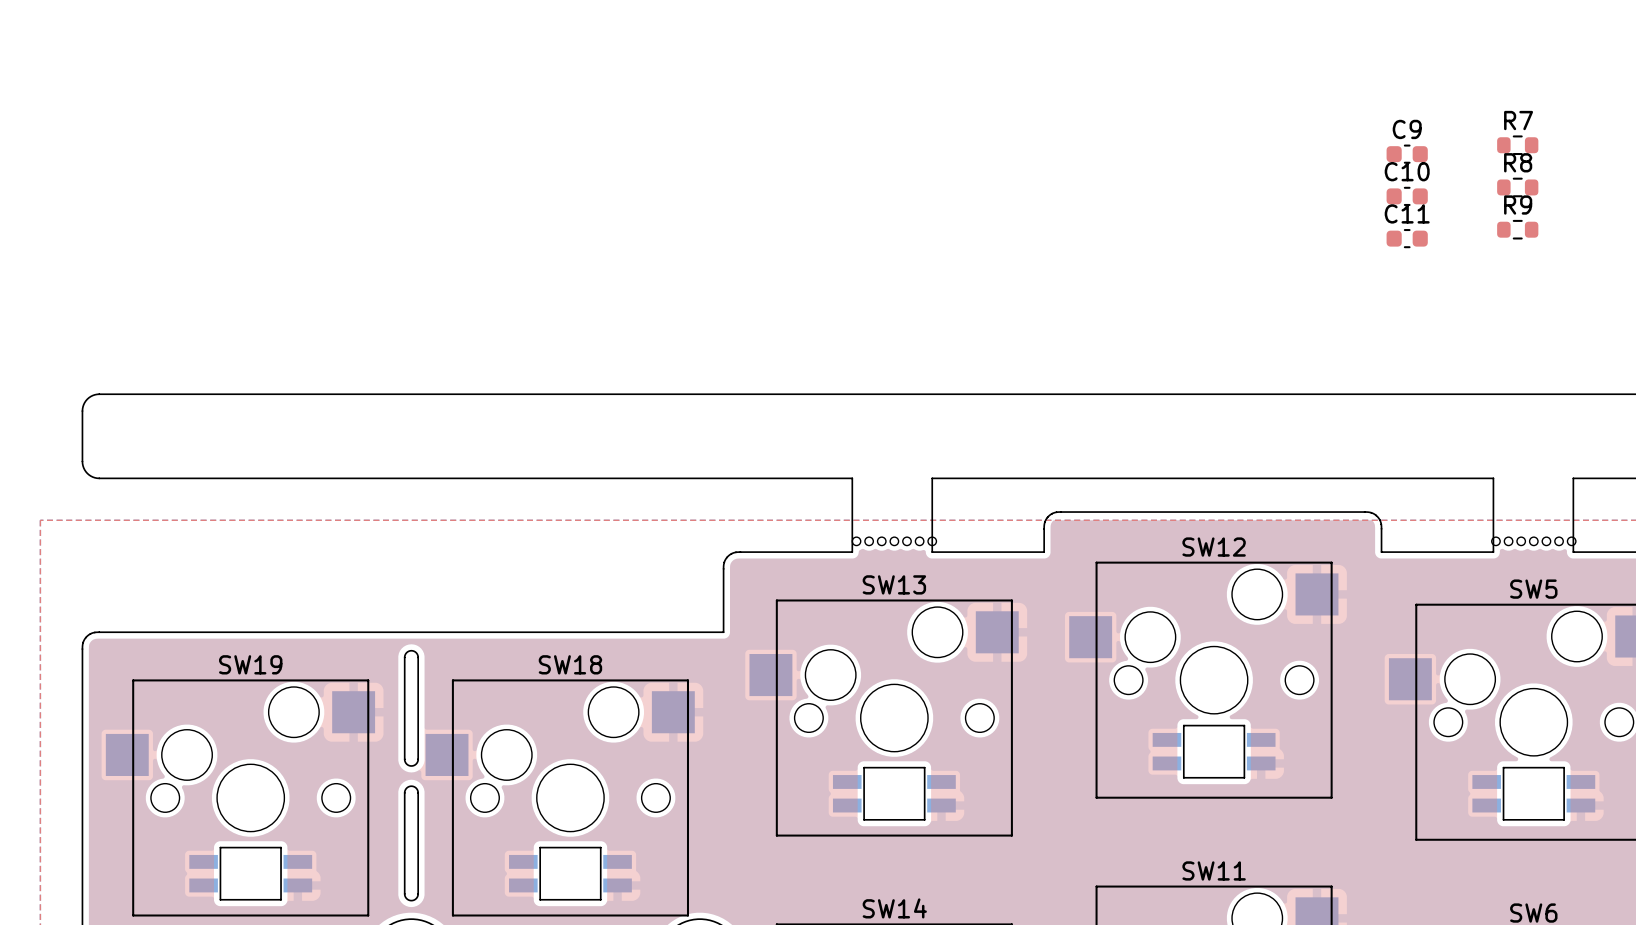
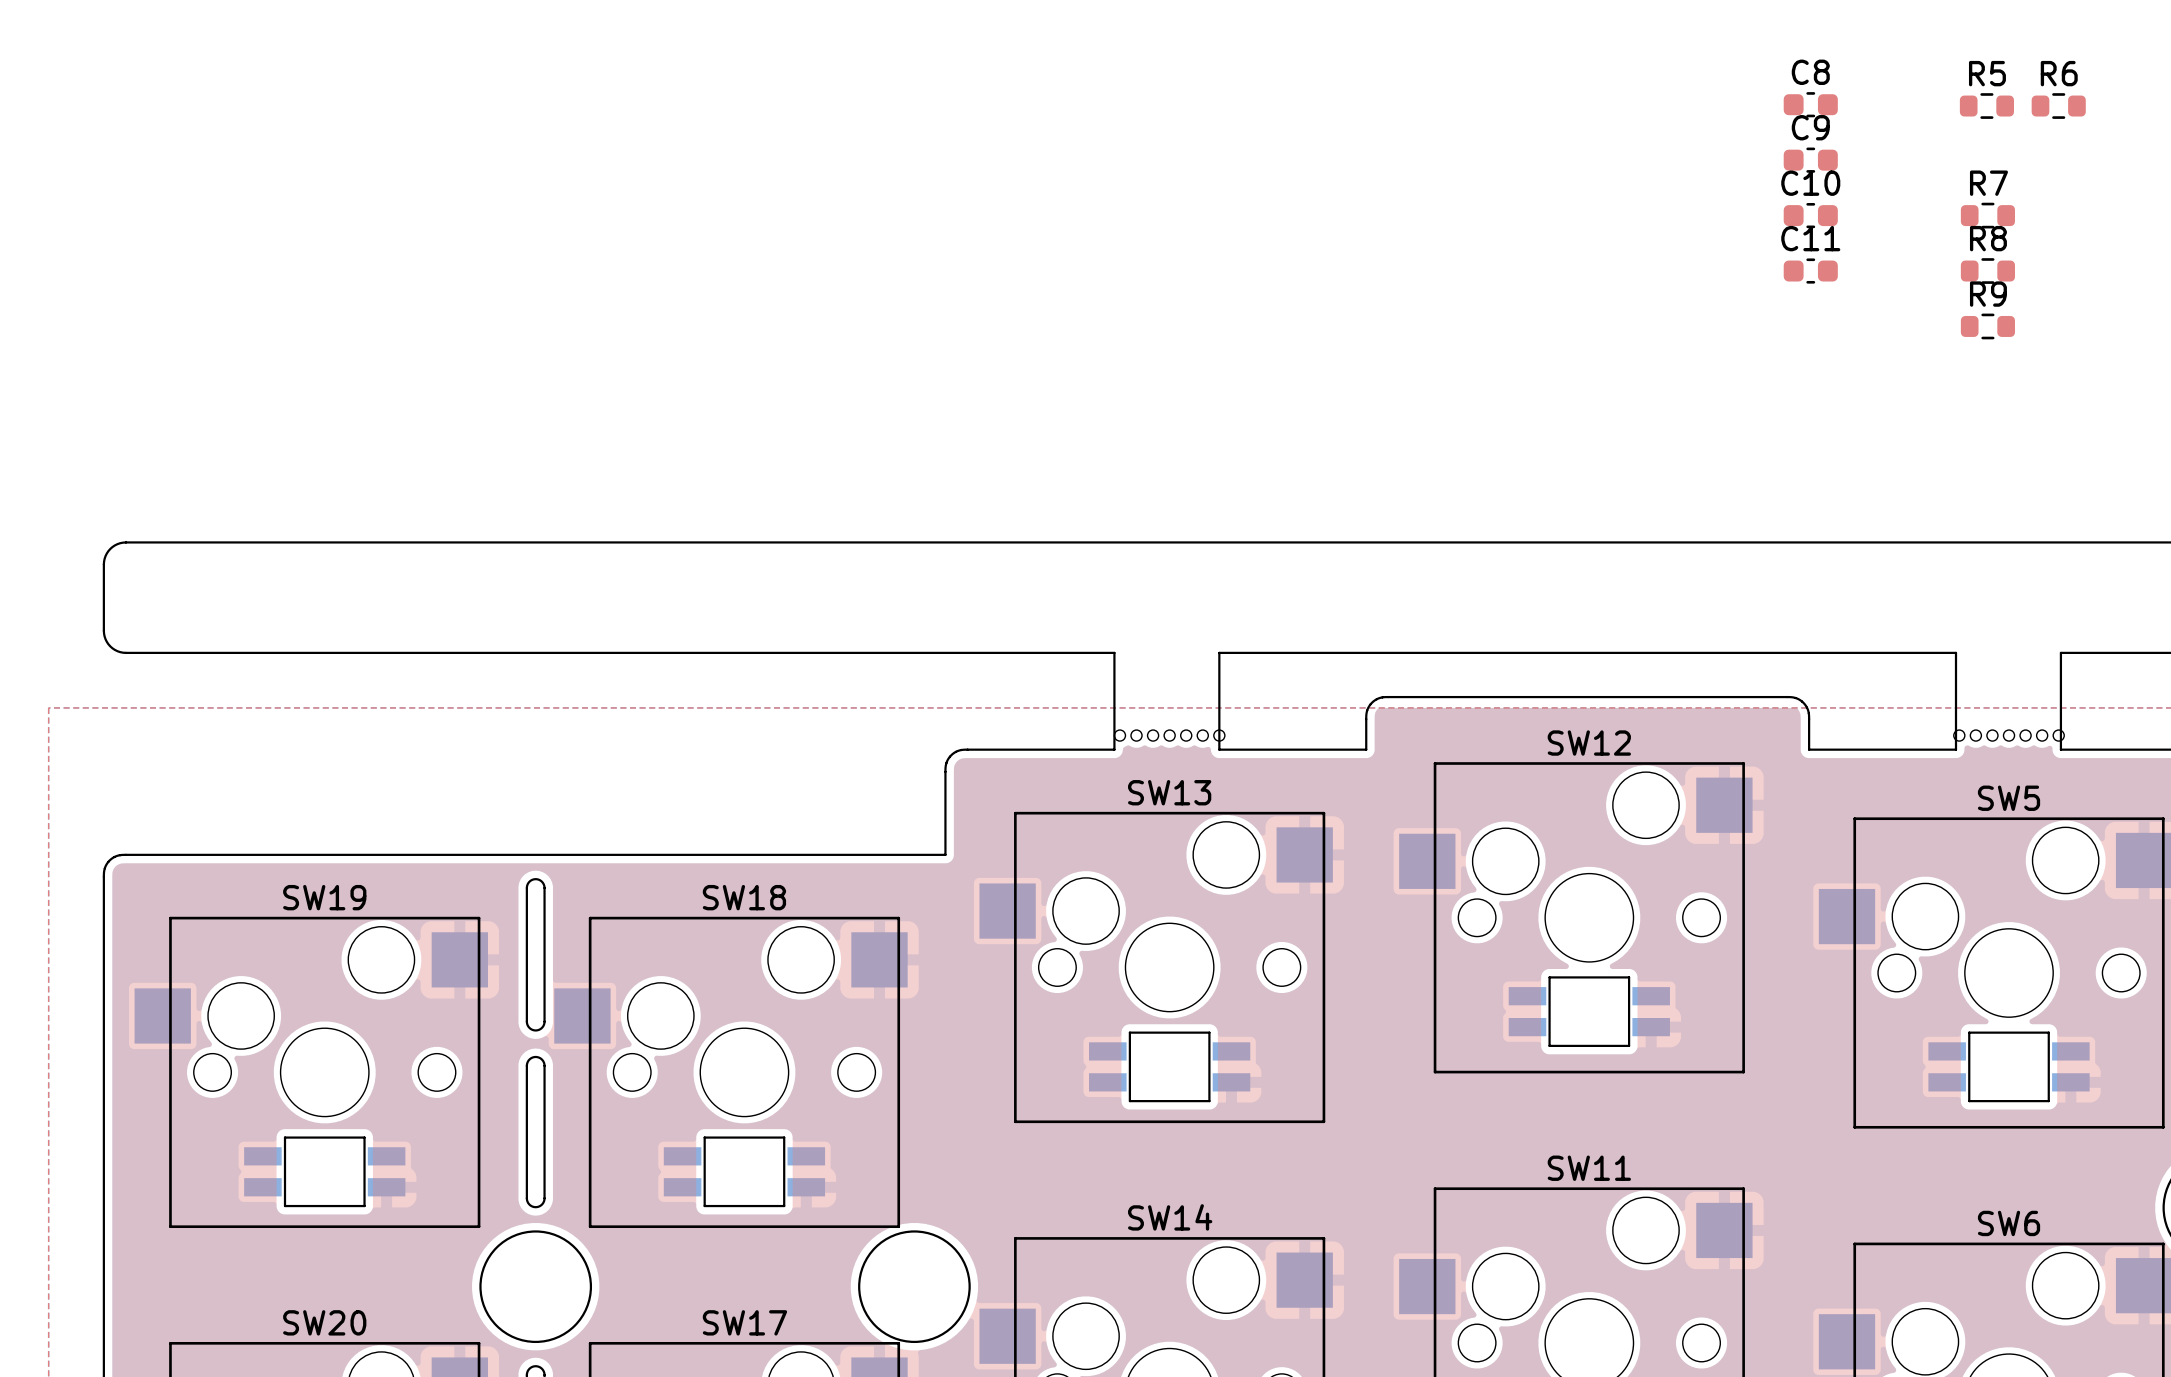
C8: none -> (1810, 104)
R5: none -> (1986, 106)
R6: none -> (2058, 106)
C9 position: (1407, 154) -> (1810, 160)
C10 position: (1407, 196) -> (1810, 215)
C11 position: (1407, 238) -> (1810, 271)

